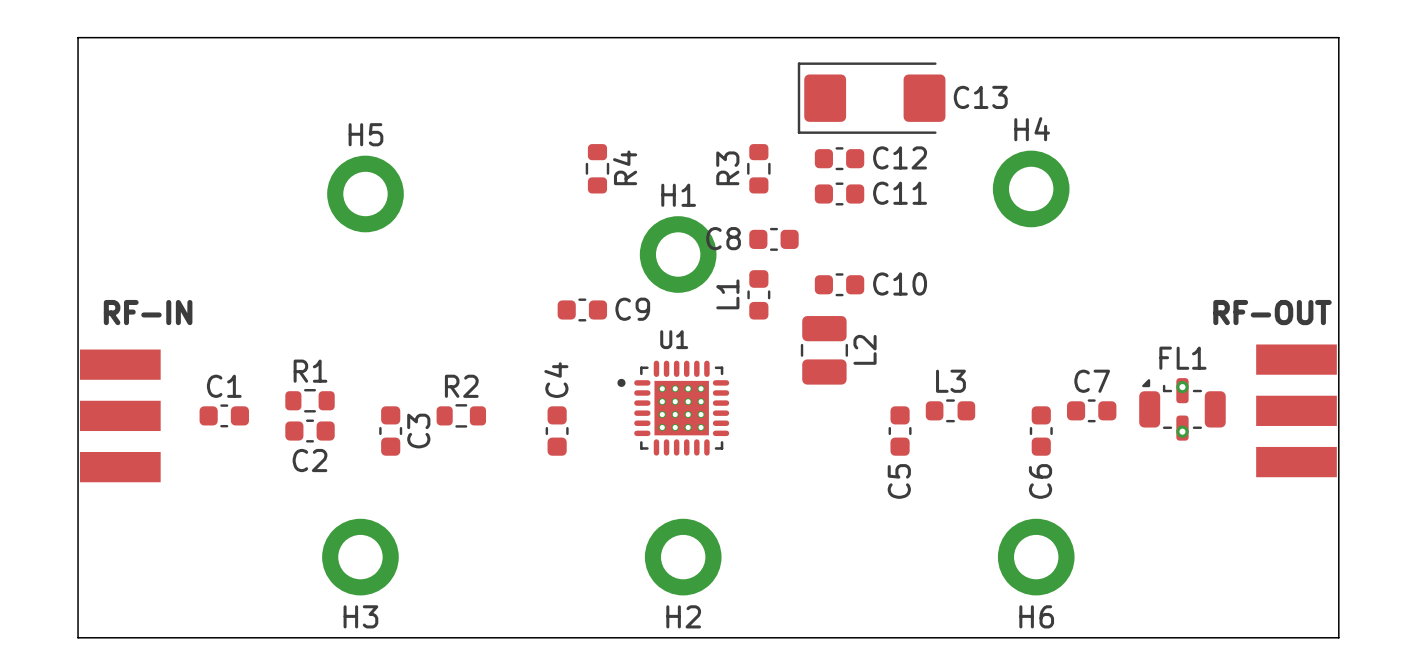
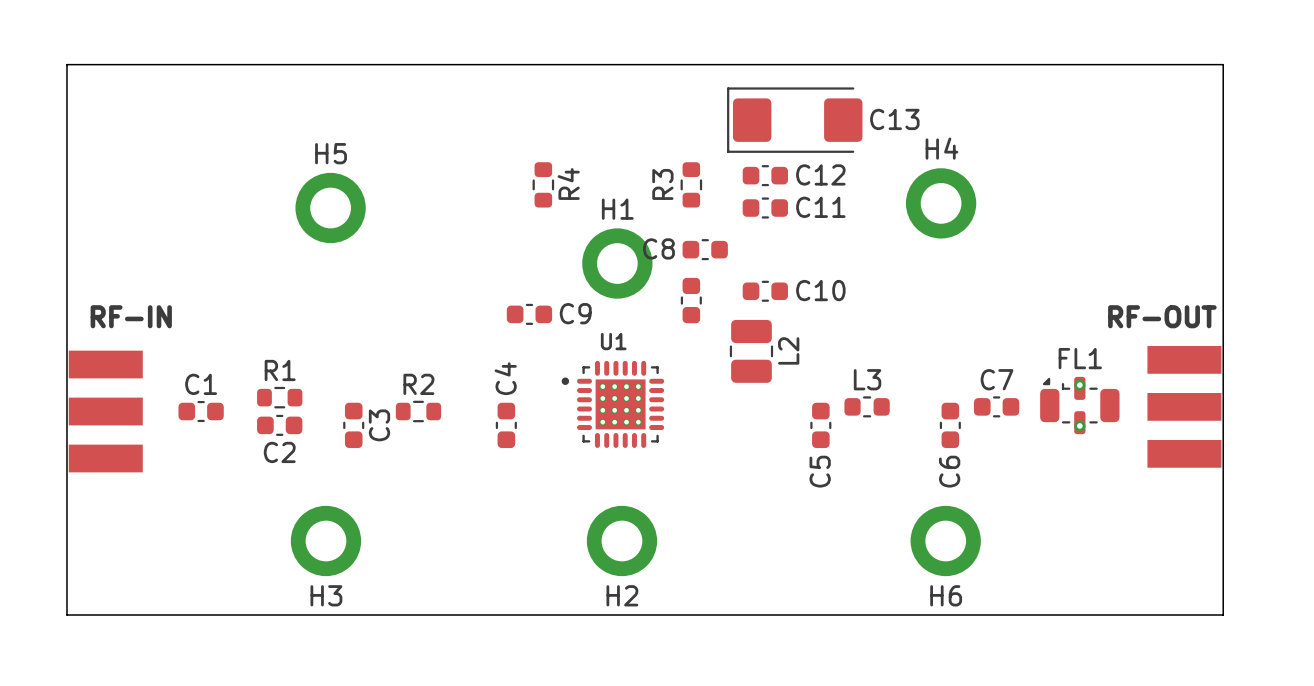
L1 name: L1 (727, 294) -> none

